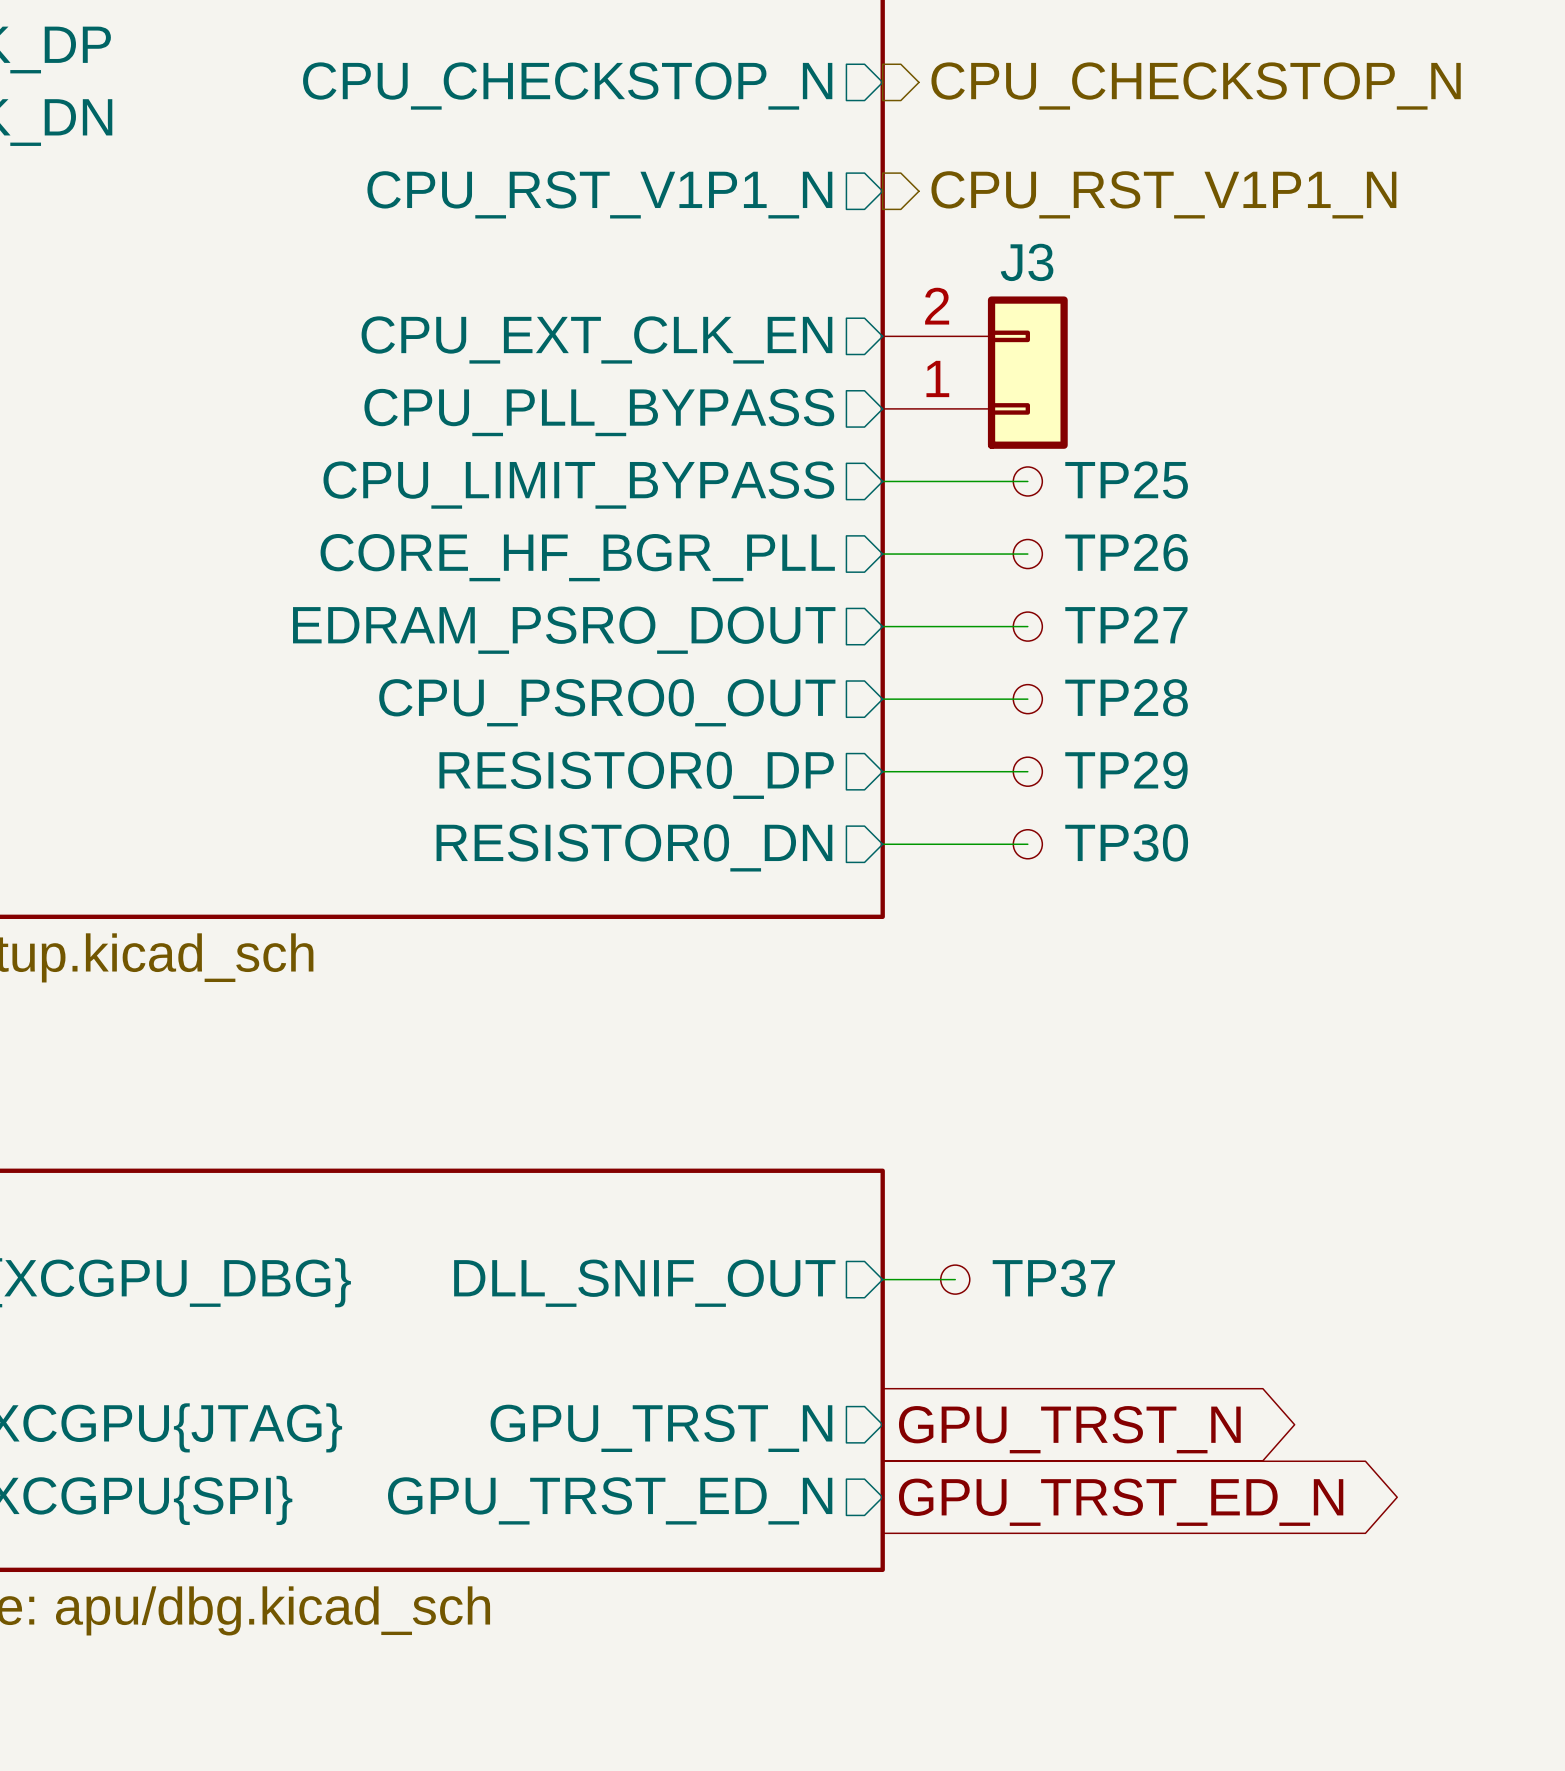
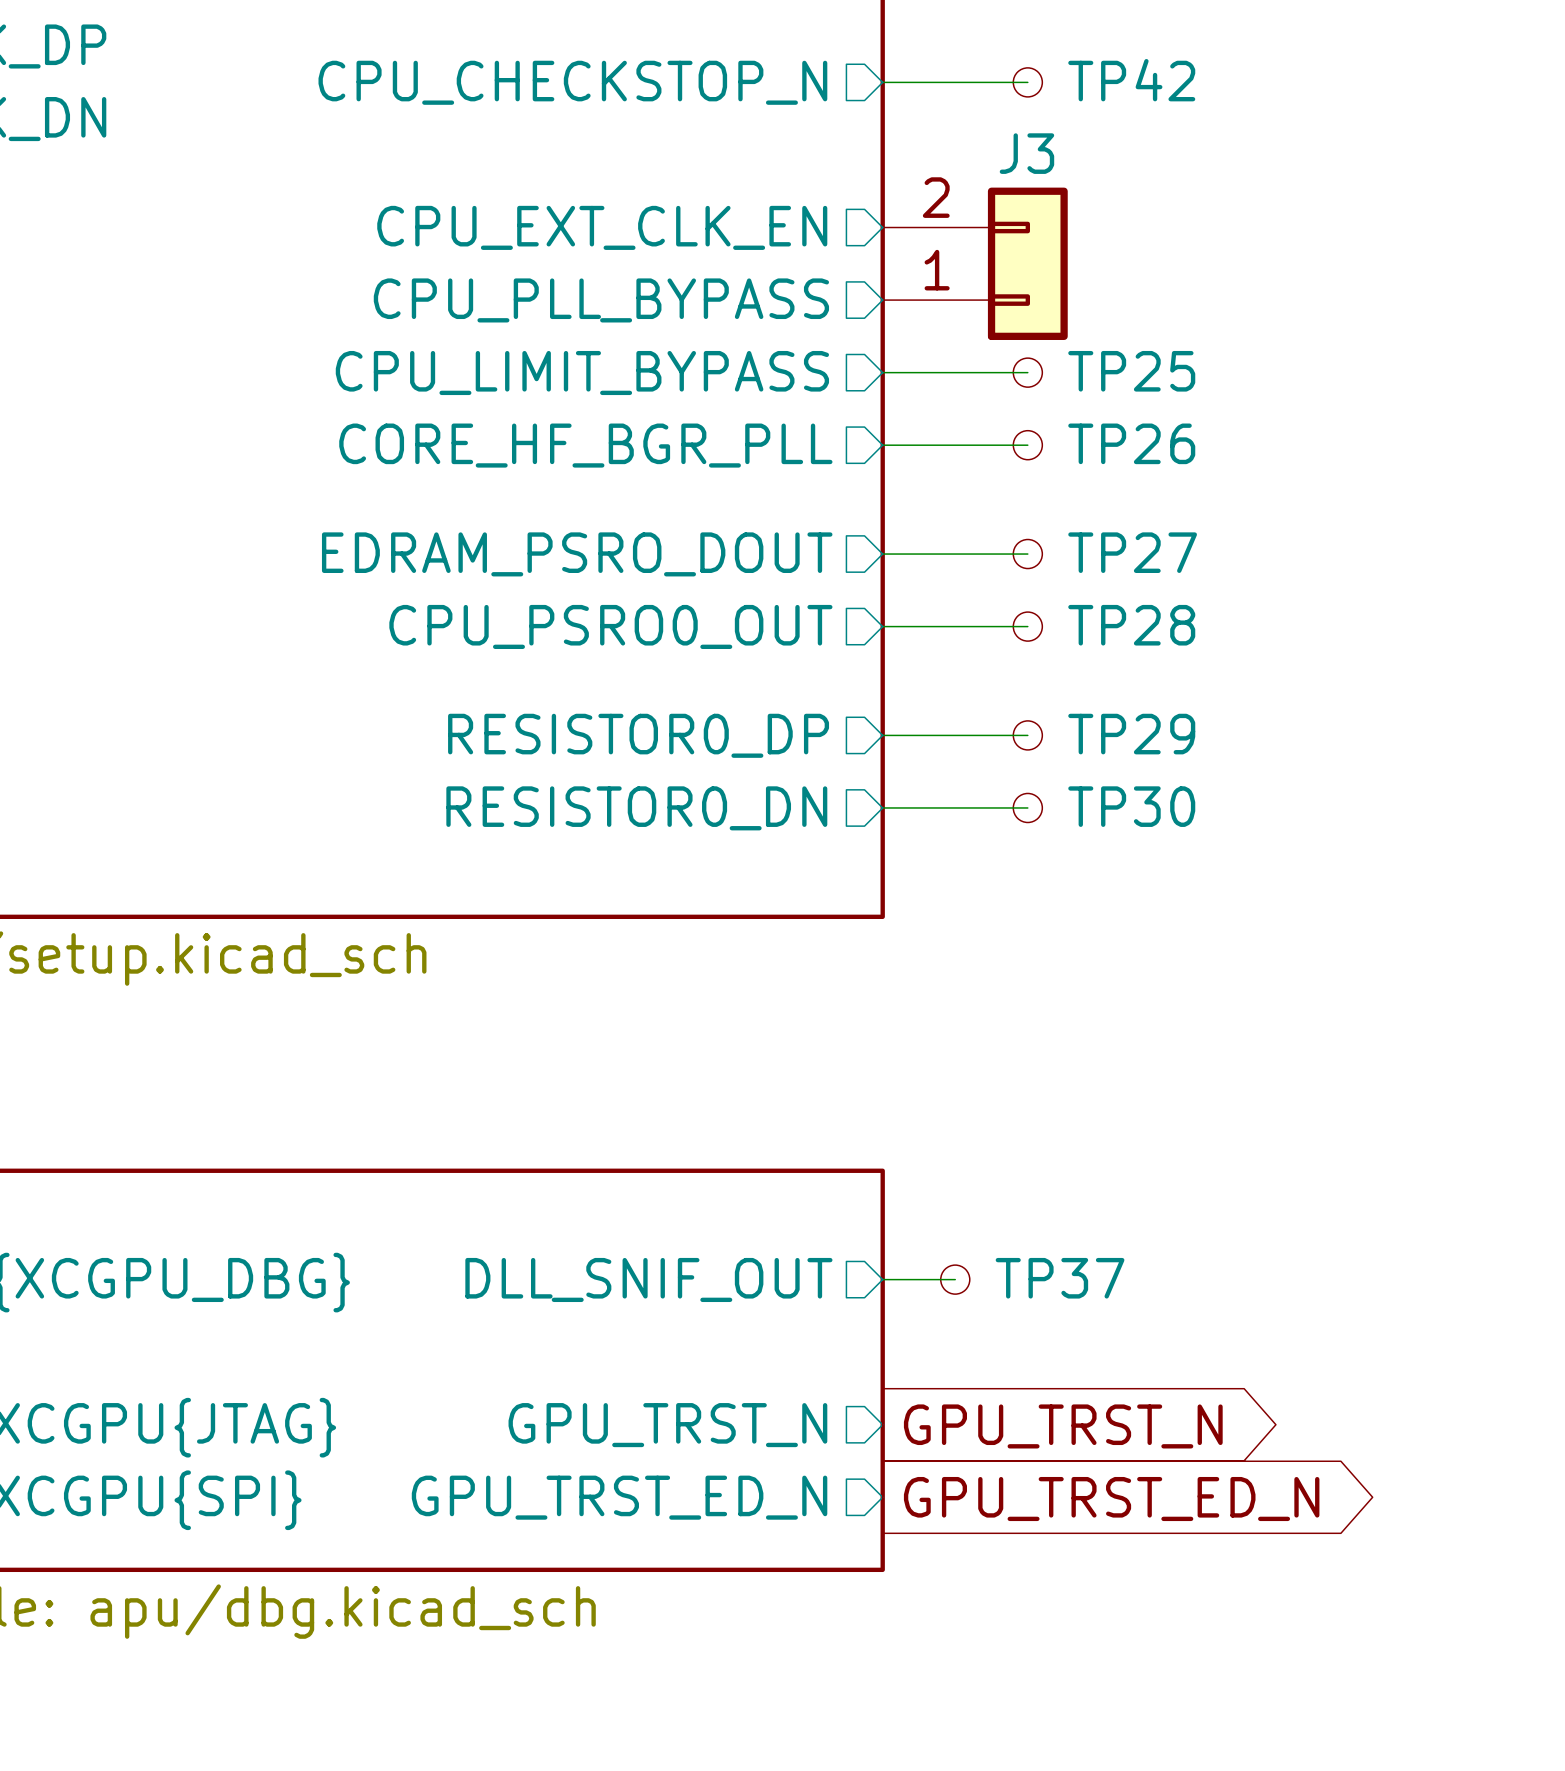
wire: none -> (882, 82) (1027, 82)
TP42: none -> (1027, 82)
hierarchical label: CPU_CHECKSTOP_N (1196, 86) -> none
sheet pin: CPU_RST_V1P1_N (599, 194) -> none
hierarchical label: CPU_RST_V1P1_N (1163, 194) -> none
sheet pin position: CPU_EXT_CLK_EN (596, 339) -> CPU_EXT_CLK_EN (602, 227)
J3 position: (975, 372) -> (975, 263)
sheet pin position: CPU_PLL_BYPASS (599, 412) -> CPU_PLL_BYPASS (601, 300)
TP26: none -> (1027, 445)
sheet pin: none -> CORE_HF_BGR_PLL (585, 445)
wire: (882, 481) (1027, 481) -> (882, 445) (1027, 445)
TP25 position: (1027, 481) -> (1027, 372)
sheet pin position: CPU_LIMIT_BYPASS (578, 485) -> CPU_LIMIT_BYPASS (582, 373)
TP26 name: TP26 (1126, 552) -> TP27 (1132, 552)
sheet pin: CORE_HF_BGR_PLL (577, 557) -> EDRAM_PSRO_DOUT (577, 554)
TP27 name: TP27 (1126, 624) -> TP28 (1131, 625)
sheet pin: EDRAM_PSRO_DOUT (564, 630) -> CPU_PSRO0_OUT (610, 626)
wire: (882, 699) (1027, 699) -> (882, 372) (1027, 372)
TP28: (1027, 699) -> none
sheet pin: CPU_PSRO0_OUT (607, 702) -> none
wire: (882, 771) (1027, 771) -> (882, 735) (1027, 735)
TP29 position: (1027, 771) -> (1027, 735)
sheet pin position: RESISTOR0_DP (636, 775) -> RESISTOR0_DP (638, 735)
wire: (882, 844) (1027, 844) -> (882, 807) (1027, 807)
TP30 position: (1027, 844) -> (1027, 807)
sheet pin position: RESISTOR0_DN (634, 847) -> RESISTOR0_DN (636, 808)

